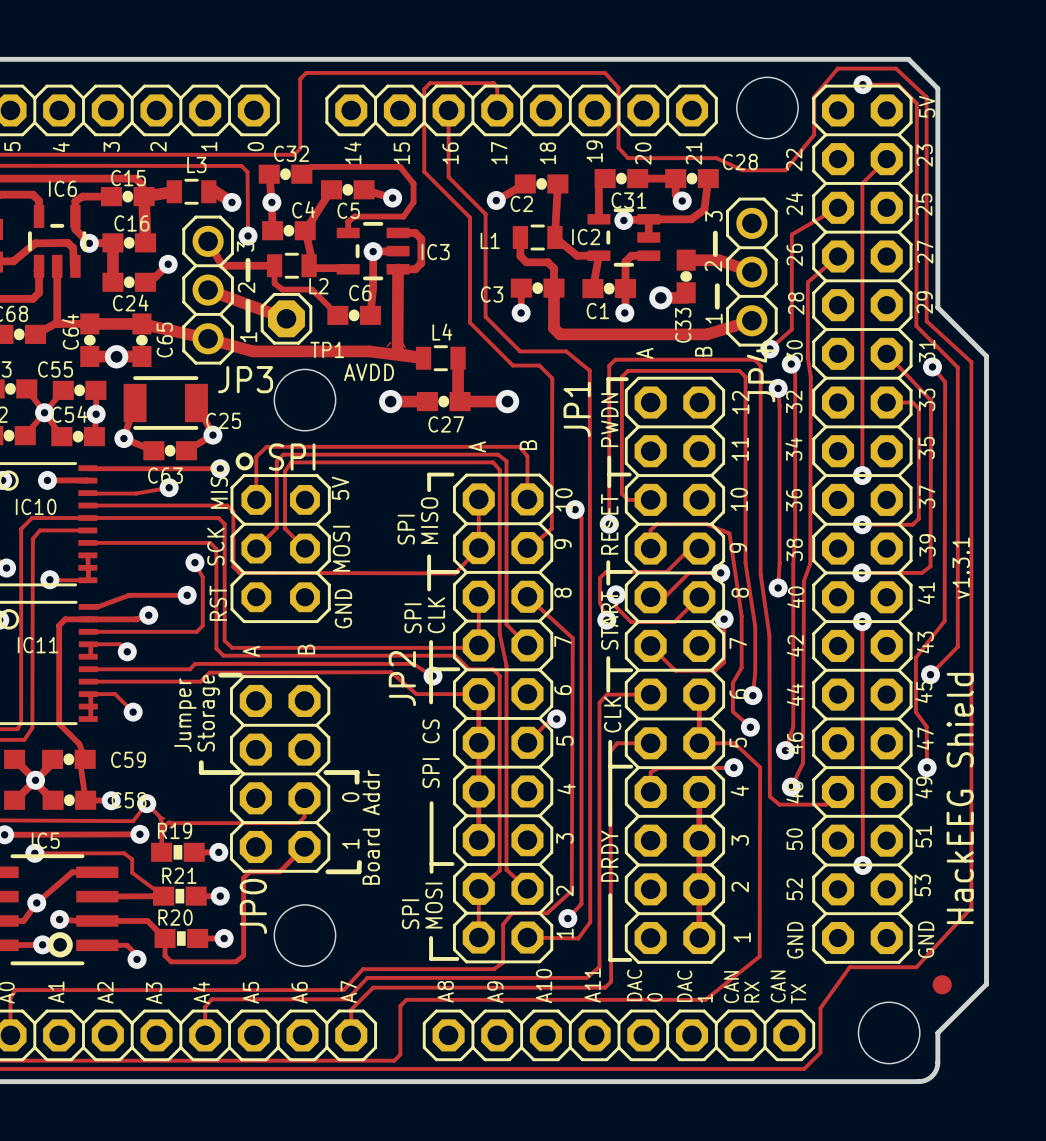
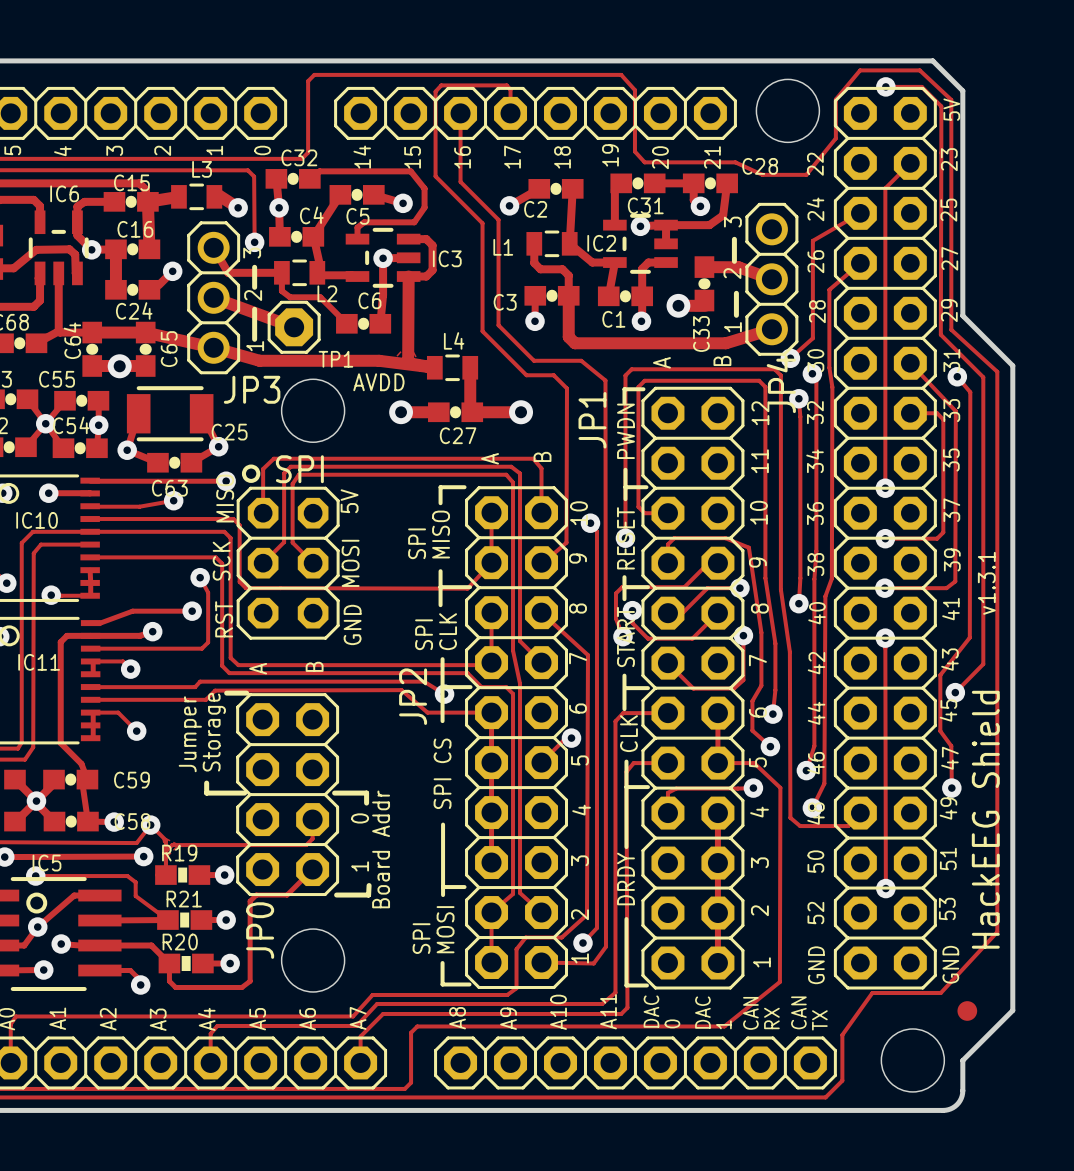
drawing: none -> [26, 892, 48, 914]
drawing: [47, 932, 73, 958] -> none

